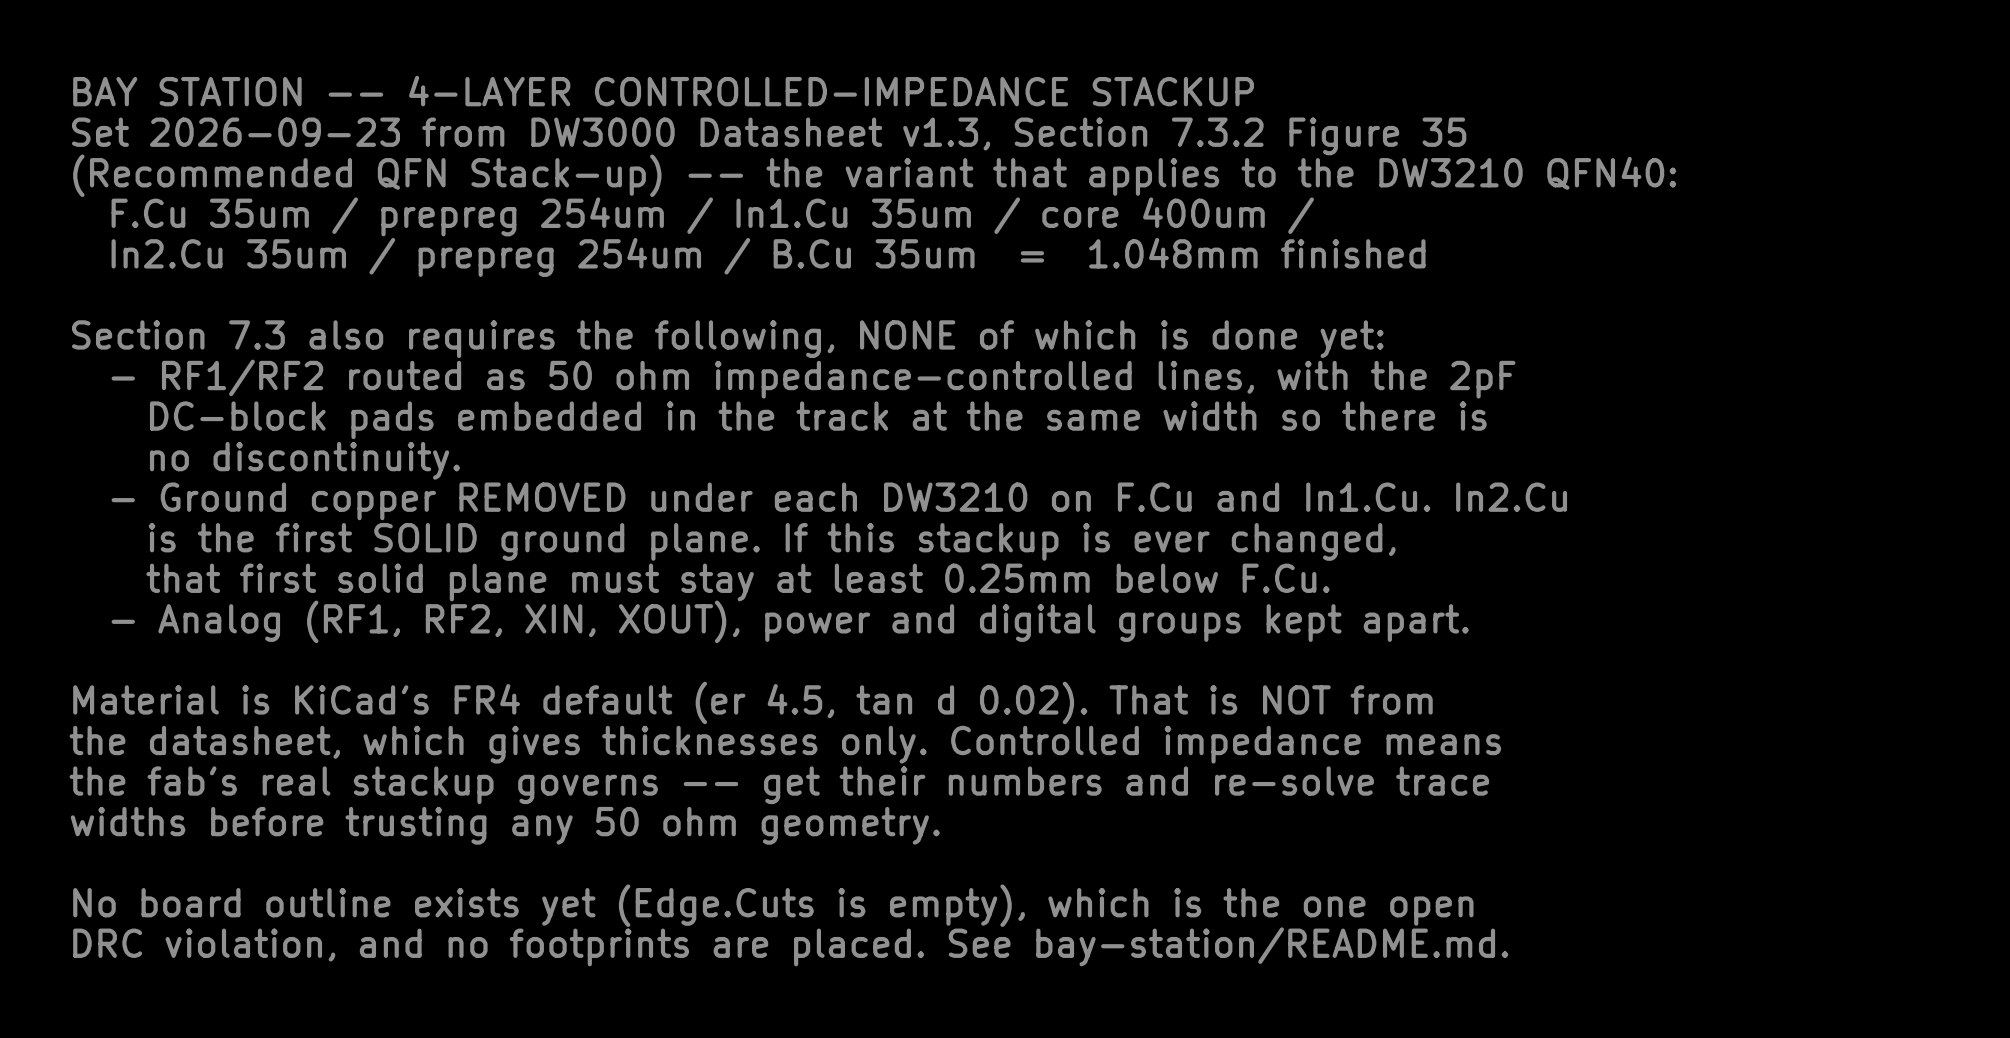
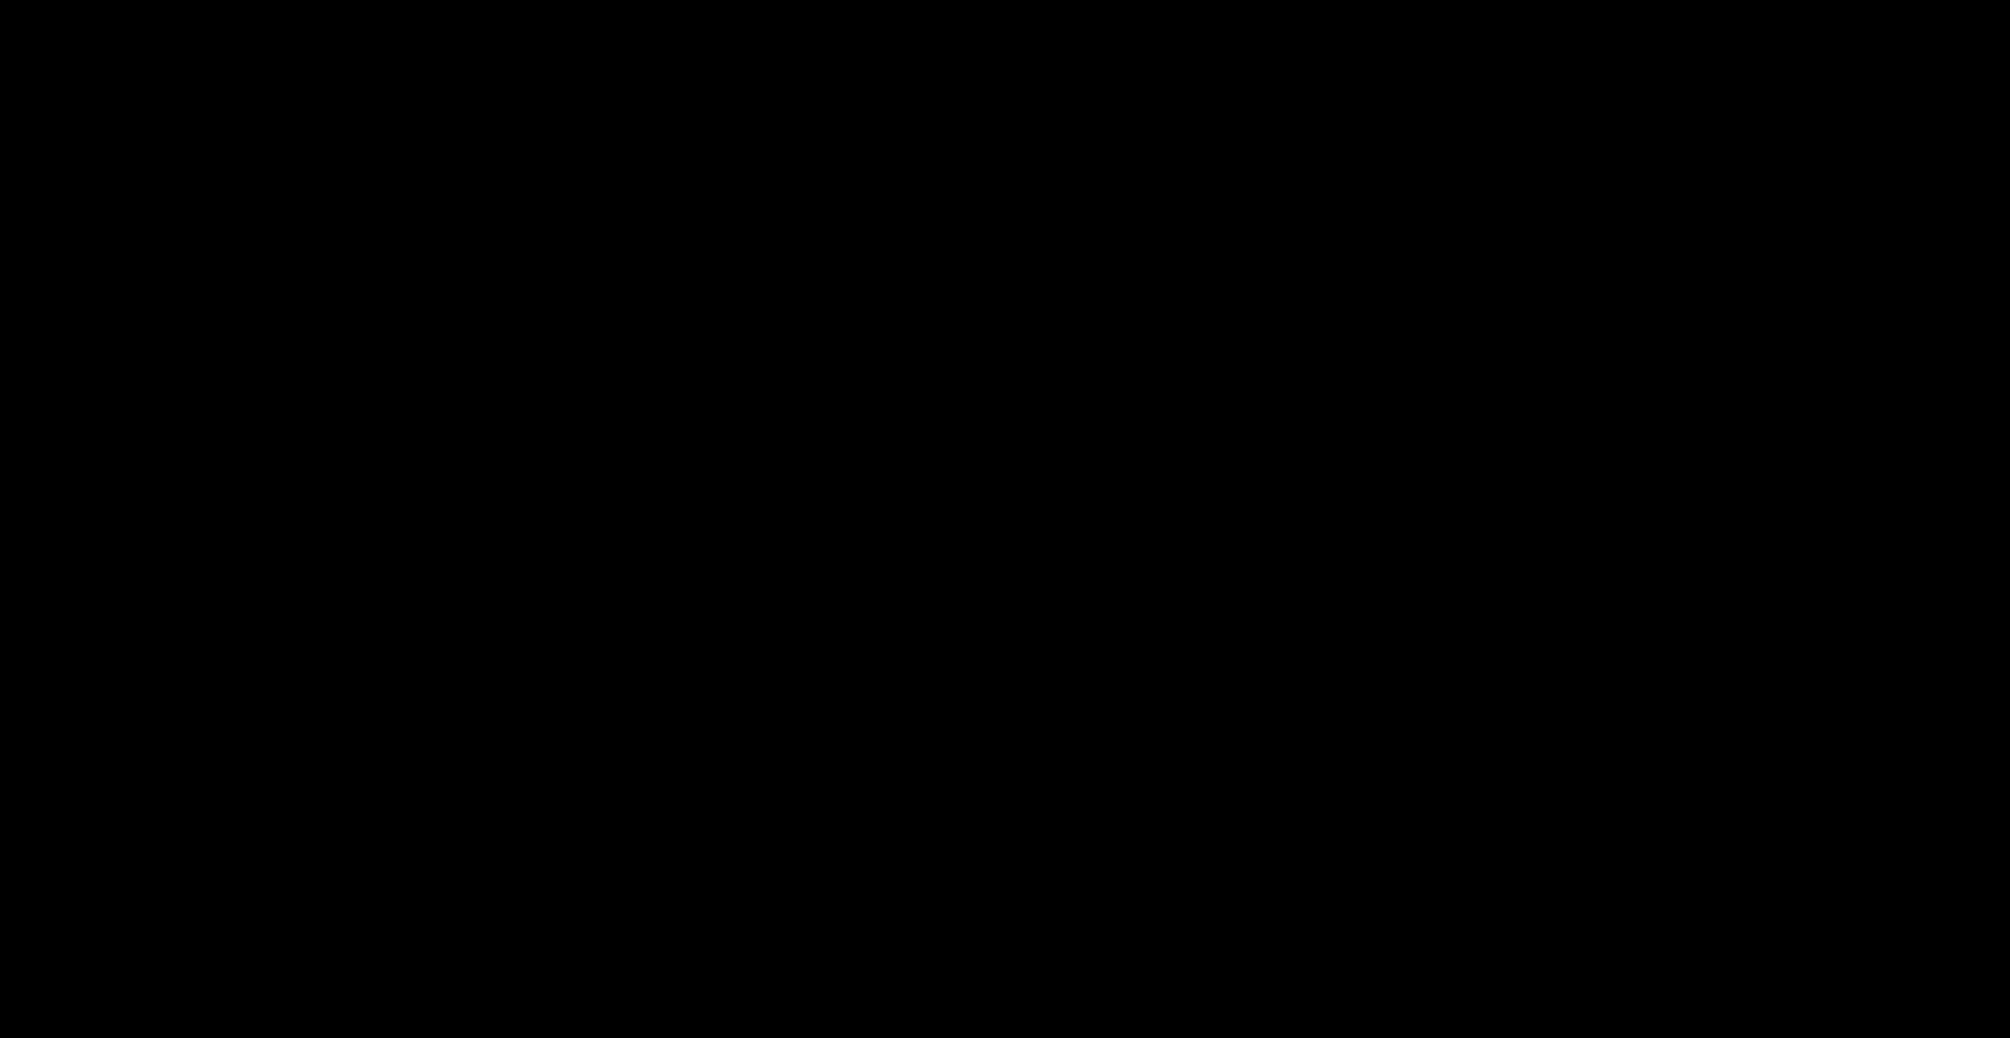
text: BAY STATION -- 4-LAYER CONTROLLED-IMPEDANCE STACKUP (663, 91) -> none
text: Set 2026-09-23 from DW3000 Datasheet v1.3, Section 7.3.2 Figure 35 (769, 136) -> none
text: (Recommended QFN Stack-up) -- the variant that applies to the DW3210 QFN40: (874, 175) -> none
text: F.Cu 35um / prepreg 254um / In1.Cu 35um / core 400um / (712, 216) -> none
text: In2.Cu 35um / prepreg 254um / B.Cu 35um = 1.048mm finished (768, 257) -> none
text: Section 7.3 also requires the following, NONE of which is done yet: (727, 339) -> none
text: - RF1/RF2 routed as 50 ohm impedance-controlled lines, with the 2pF (813, 379) -> none
text: DC-block pads embedded in the track at the same width so there is (818, 420) -> none
text: no discontinuity. (304, 460) -> none
text: - Ground copper REMOVED under each DW3210 on F.Cu and In1.Cu. In2.Cu (839, 501) -> none
text: is the first SOLID ground plane. If this stackup is ever changed, (772, 541) -> none
text: that first solid plane must stay at least 0.25mm below F.Cu. (737, 582) -> none
text: - Analog (RF1, RF2, XIN, XOUT), power and digital groups kept apart. (790, 621) -> none
text: Material is KiCad's FR4 default (er 4.5, tan d 0.02). That is NOT from (752, 702) -> none
text: the datasheet, which gives thicknesses only. Controlled impedance means (785, 744) -> none
text: the fab's real stackup governs -- get their numbers and re-solve trace (779, 785) -> none
text: widths before trusting any 50 ohm geometry. (505, 825) -> none
text: No board outline exists yet (Edge.Cuts is empty), which is the one open (773, 905) -> none
text: DRC violation, and no footprints are placed. See bay-station/README.md. (790, 946) -> none

